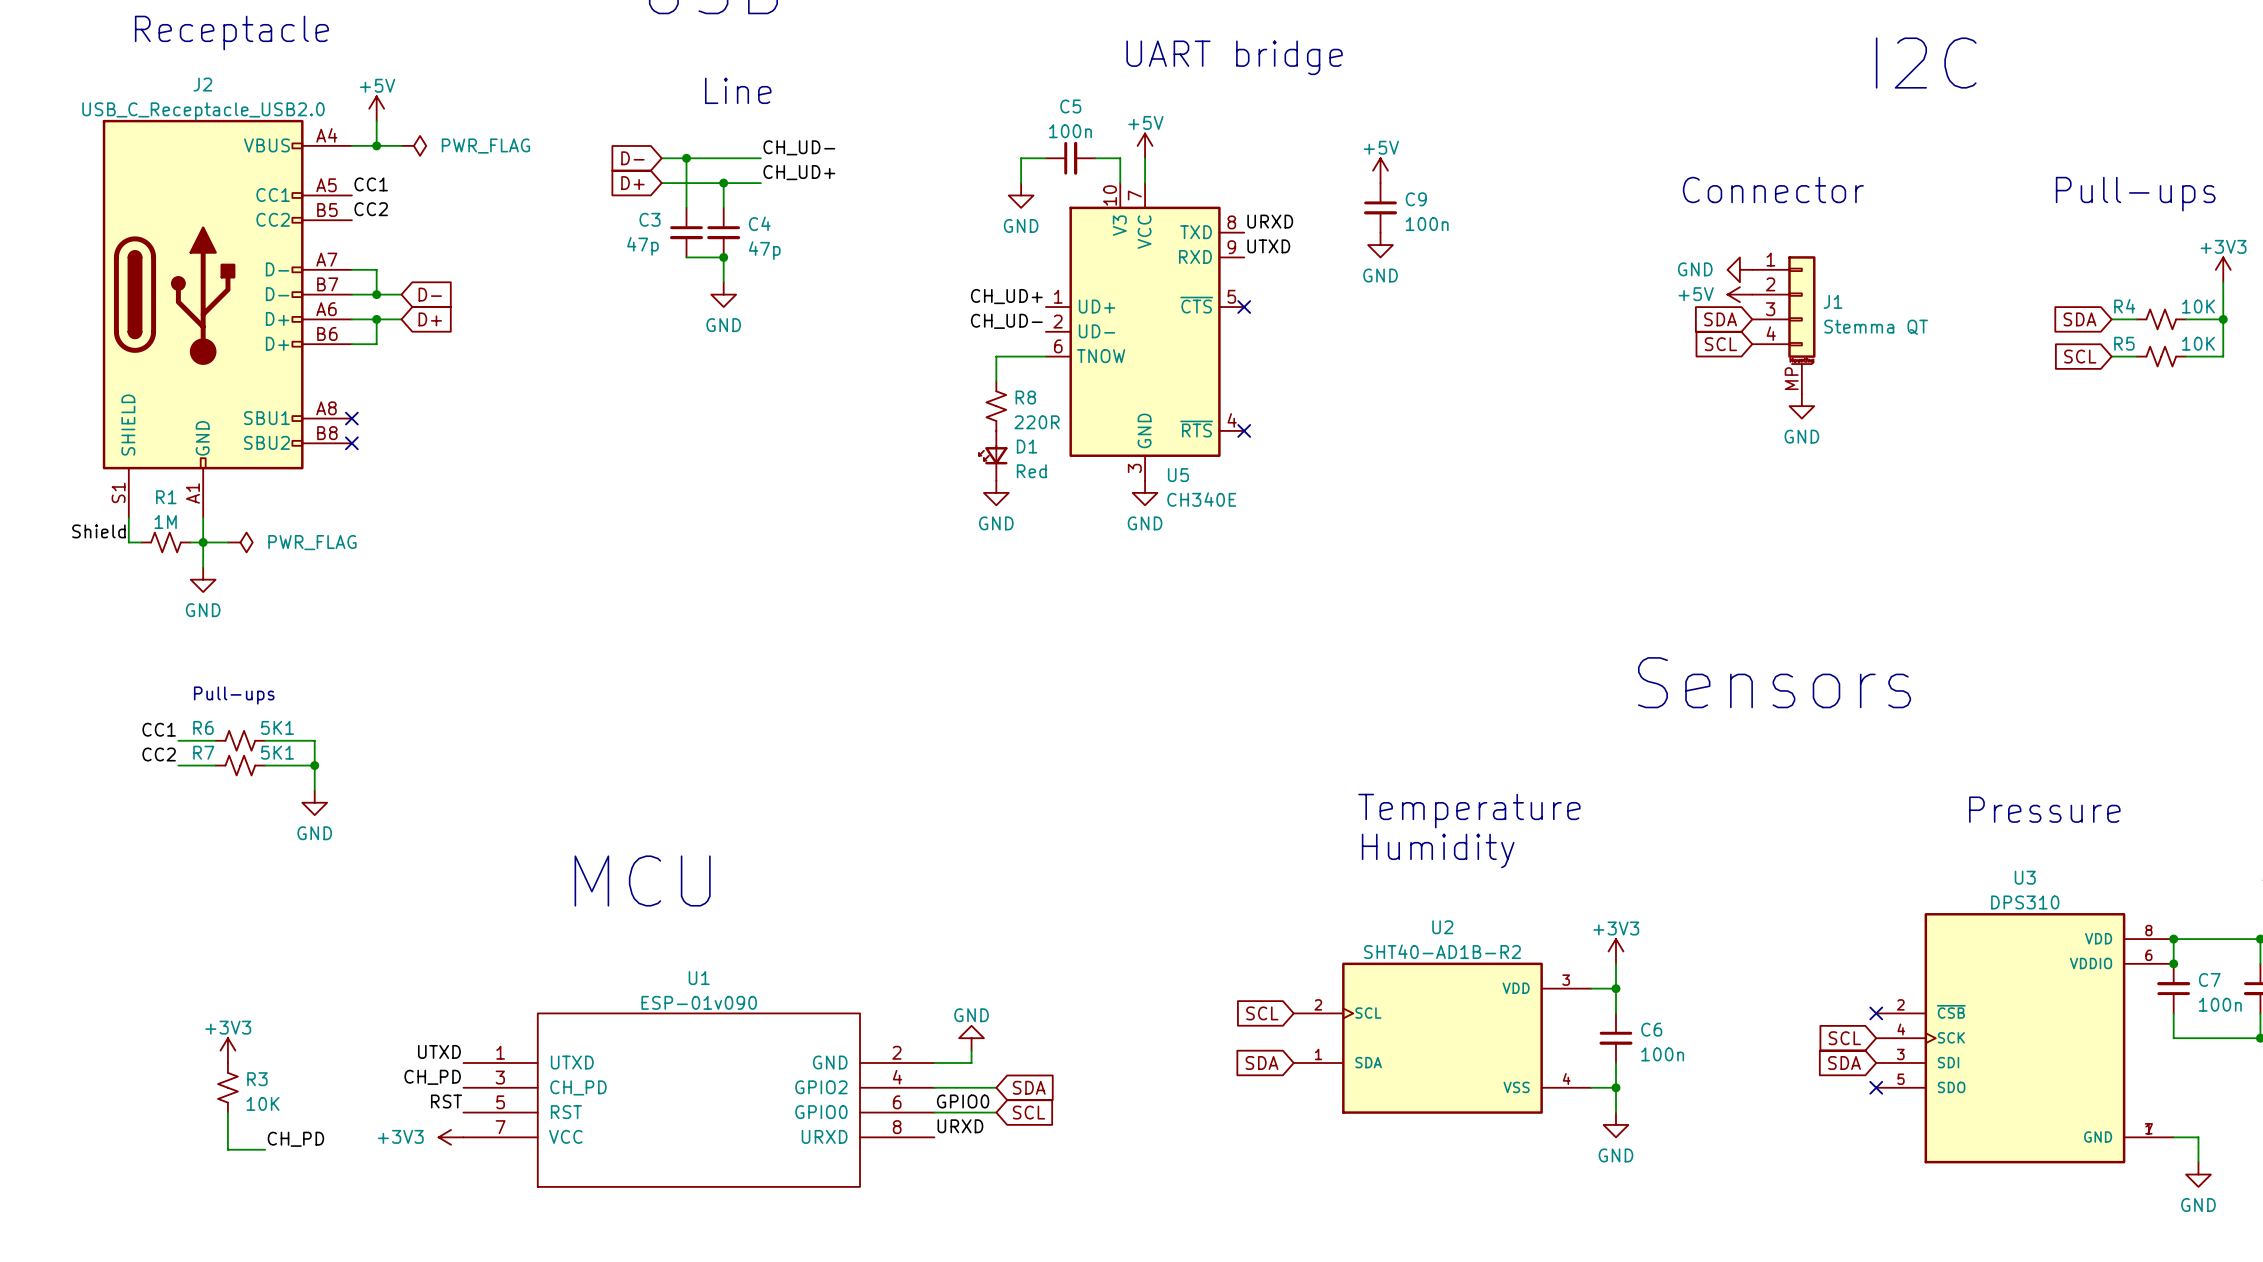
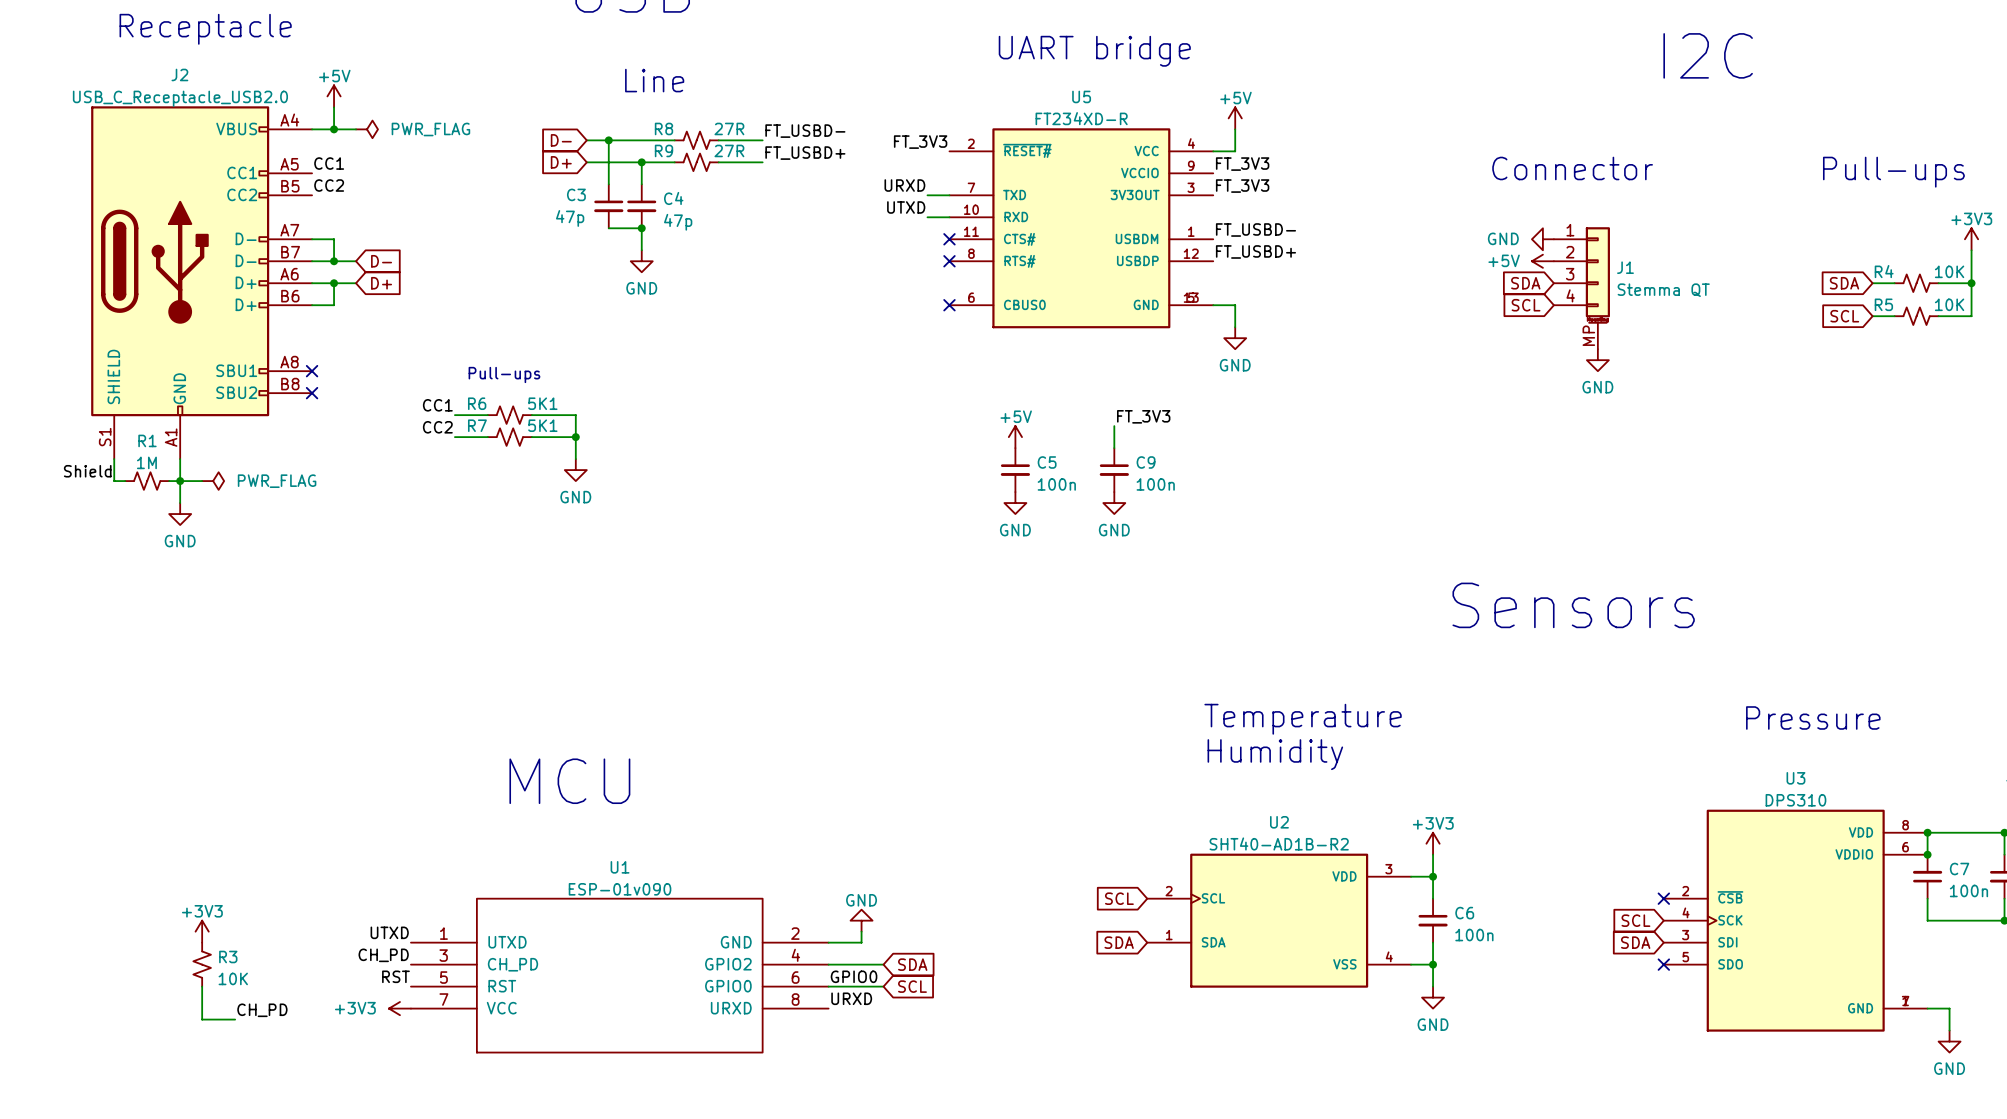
C5 value position: 100n (1070, 131) -> 100n (1056, 484)
power symbol: +5V (1145, 145) -> none
wire: none -> (1235, 129) (1235, 151) (1213, 151)
label: CH_UD- (799, 147) -> none
label: none -> FT_USBD- (805, 131)
wire: none -> (718, 140) (762, 140)
wire: (1045, 158) (1021, 158) (1021, 183) -> none
C5 rotation: 0° (1070, 158) -> 90° clockwise (1015, 470)
C5 position: (1070, 158) -> (1015, 470)
wire: (1095, 158) (1120, 158) (1120, 183) -> none
label: none -> FT_3V3 (920, 142)
power symbol position: +5V (1380, 170) -> +5V (1235, 118)
label: CH_UD+ (799, 172) -> none
label: none -> FT_USBD+ (805, 153)
R9: none -> 27R (696, 162)
wire: none -> (718, 162) (762, 162)
U5 symbol: [1045, 183, 1245, 481] -> [949, 128, 1214, 329]
label: none -> FT_3V3 (1242, 164)
power symbol: GND (1021, 195) -> none
C9 position: (1380, 207) -> (1114, 470)
label: none -> FT_3V3 (1242, 186)
wire: none -> (927, 195) (949, 195)
label position: URXD (1270, 221) -> URXD (904, 185)
wire: none -> (927, 217) (949, 217)
power symbol position: GND (1380, 245) -> GND (1235, 338)
label position: UTXD (1268, 246) -> UTXD (906, 207)
label: none -> FT_USBD- (1255, 230)
no-connect mark: none -> (949, 239)
label: none -> FT_USBD+ (1255, 251)
no-connect mark: none -> (949, 261)
label: CH_UD+ (1006, 296) -> none
no-connect mark: (1244, 307) -> none
label: CH_UD- (1006, 321) -> none
no-connect mark: none -> (949, 305)
wire: none -> (1213, 305) (1235, 305) (1235, 327)
wire: (1045, 356) (996, 356) (996, 381) -> none
R8 name position: R8 (1025, 397) -> R8 (663, 128)
R8 rotation: 0° (996, 406) -> 90° clockwise (696, 140)
R8 position: (996, 406) -> (696, 140)
text: none -> Pull-ups (504, 374)
R8 value: 220R (1037, 422) -> 27R (729, 128)
no-connect mark: (1244, 430) -> none
D1: Red (993, 455) -> none
label: none -> CC1 (437, 405)
wire: none -> (454, 415) (487, 415)
wire: none -> (531, 415) (575, 415) (575, 459)
label: none -> FT_3V3 (1143, 416)
U5 name position: U5 (1178, 475) -> U5 (1081, 96)
wire: none -> (1114, 426) (1114, 448)
label: none -> CC2 (437, 427)
wire: none -> (454, 437) (487, 437)
wire: none -> (531, 437) (575, 437)
junction: none -> (575, 437)
power symbol: GND (996, 492) -> none
power symbol: GND (1145, 492) -> +5V (1015, 437)
U5 value: CH340E (1201, 499) -> FT234XD-R (1081, 118)
power symbol: none -> GND (575, 470)
power symbol: none -> GND (1015, 503)
power symbol: none -> GND (1114, 503)
text: Pull-ups (234, 695) -> none
label: CC1 (159, 729) -> none
wire: (178, 740) (215, 740) -> none
R6 position: (240, 740) -> (509, 415)
wire: (265, 740) (314, 740) (314, 790) -> none
label: CC2 (159, 754) -> none
wire: (178, 765) (215, 765) -> none
R7 position: (240, 765) -> (509, 437)
wire: (265, 765) (314, 765) -> none
junction: (314, 765) -> none
power symbol: GND (314, 802) -> none

